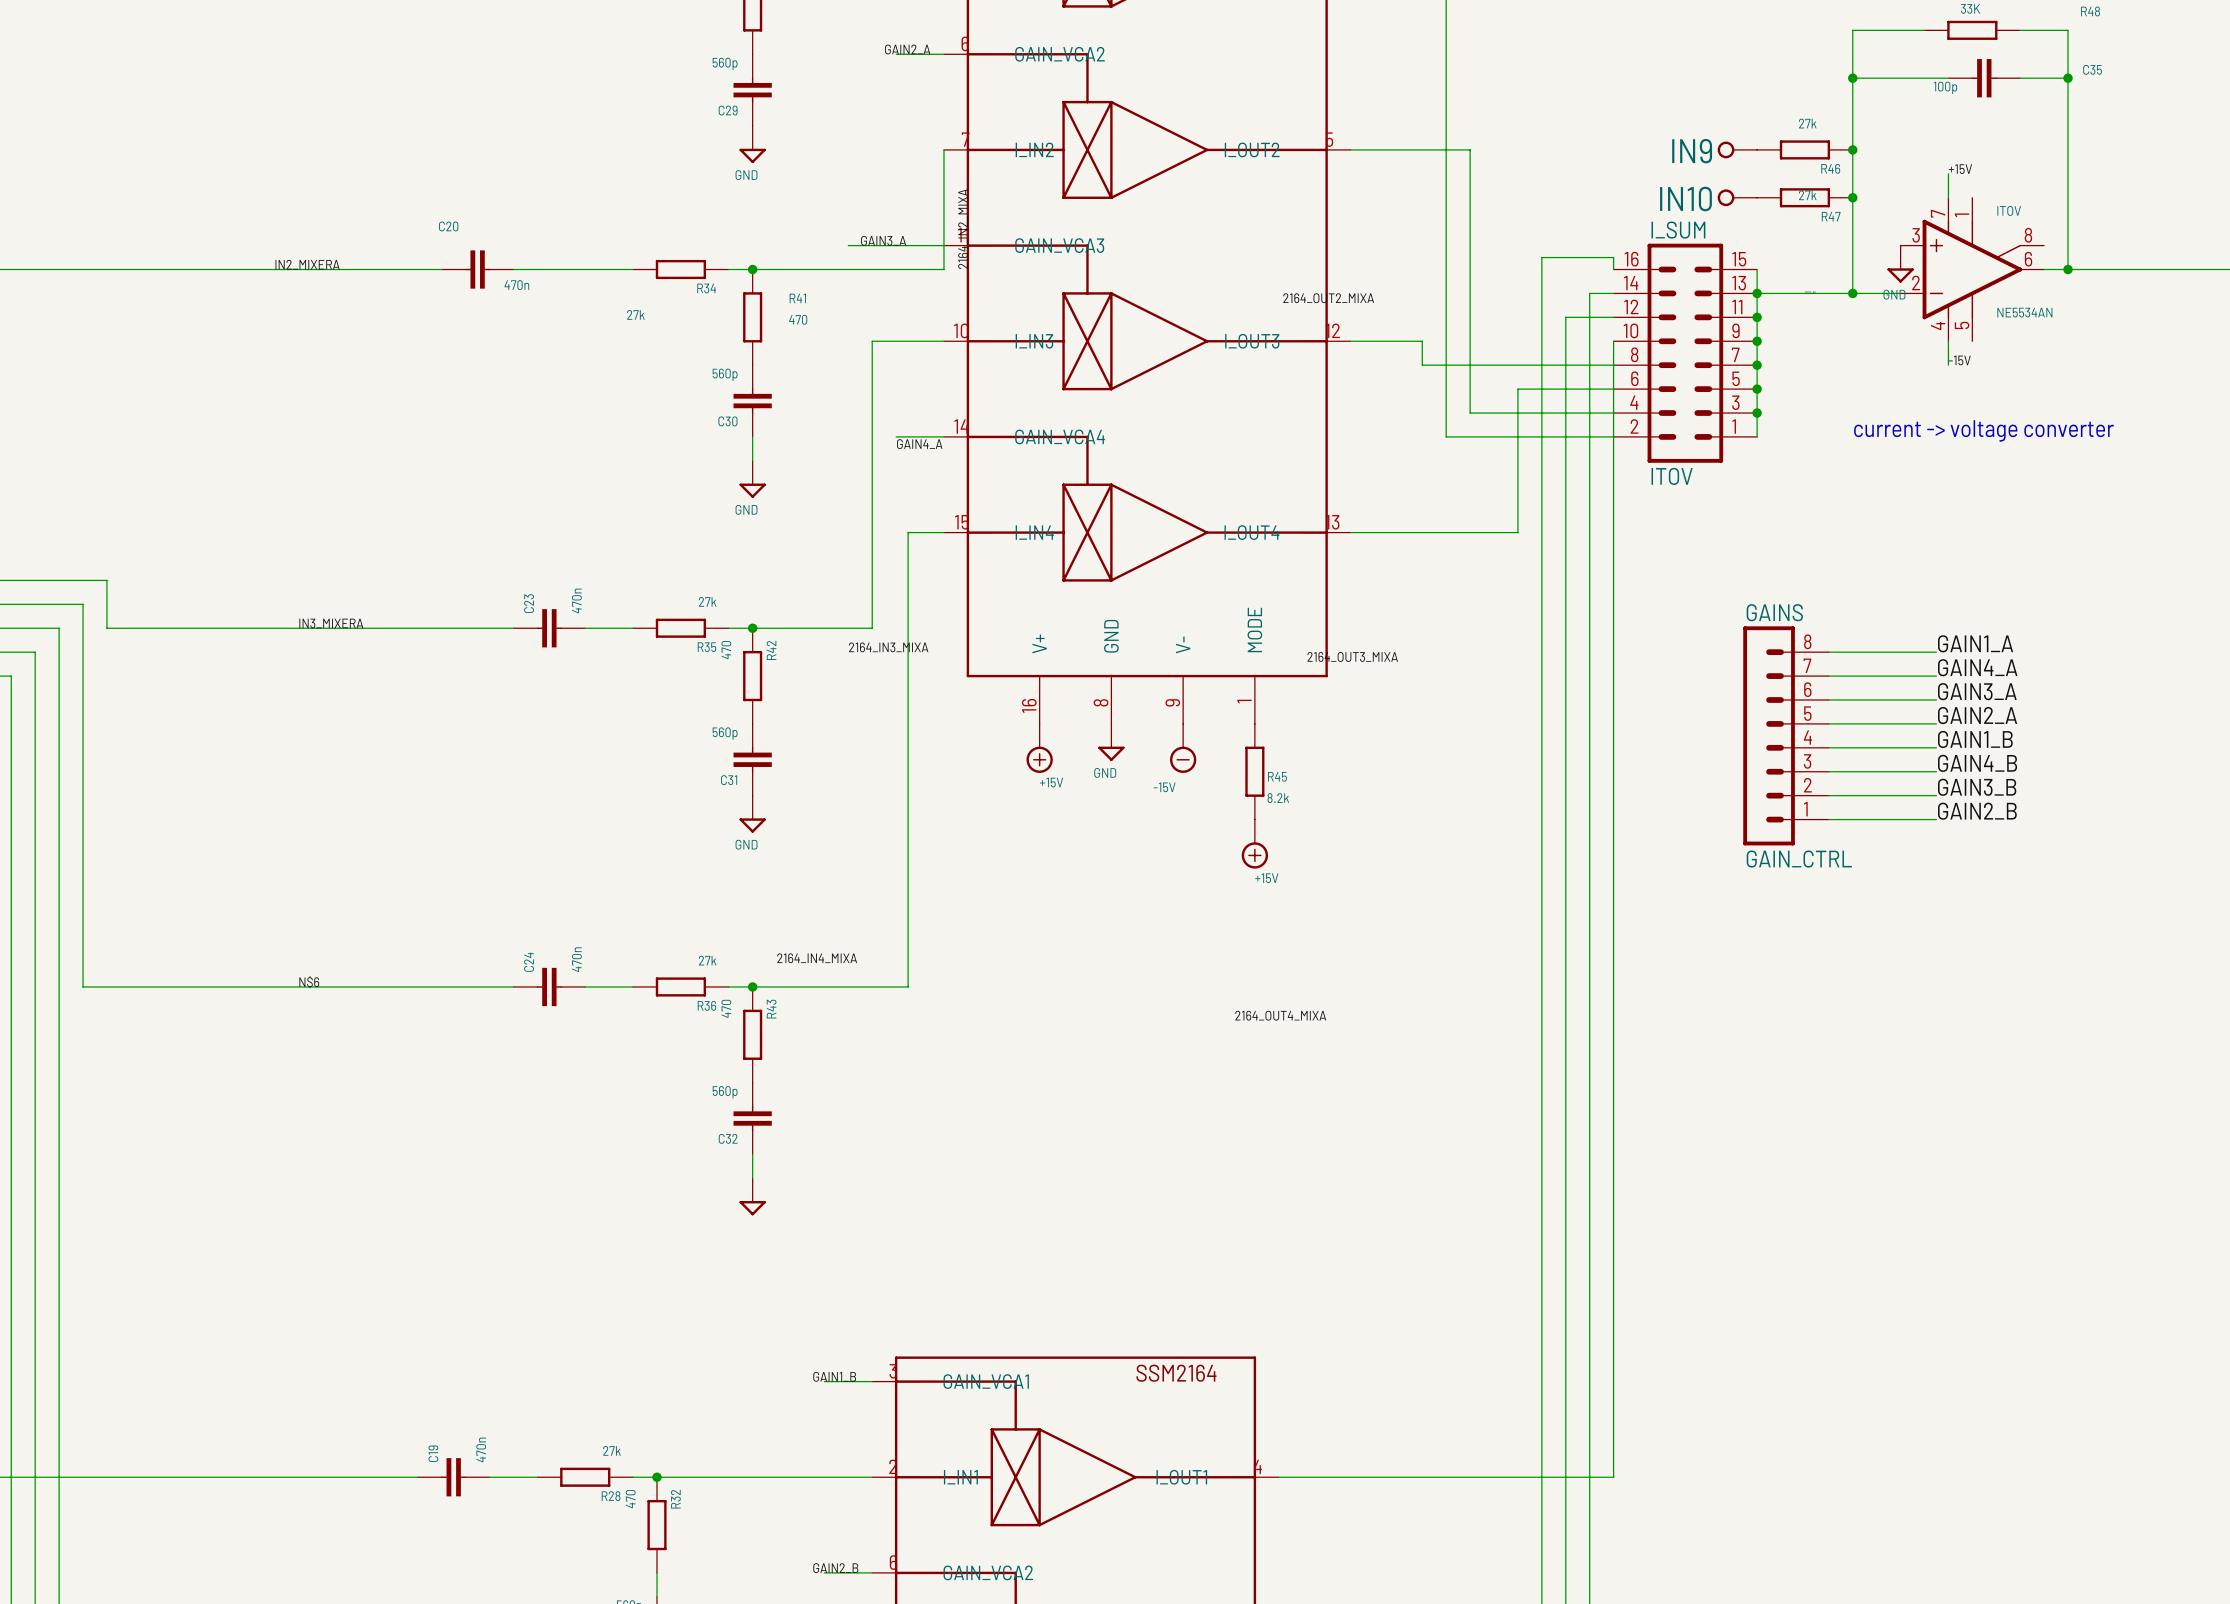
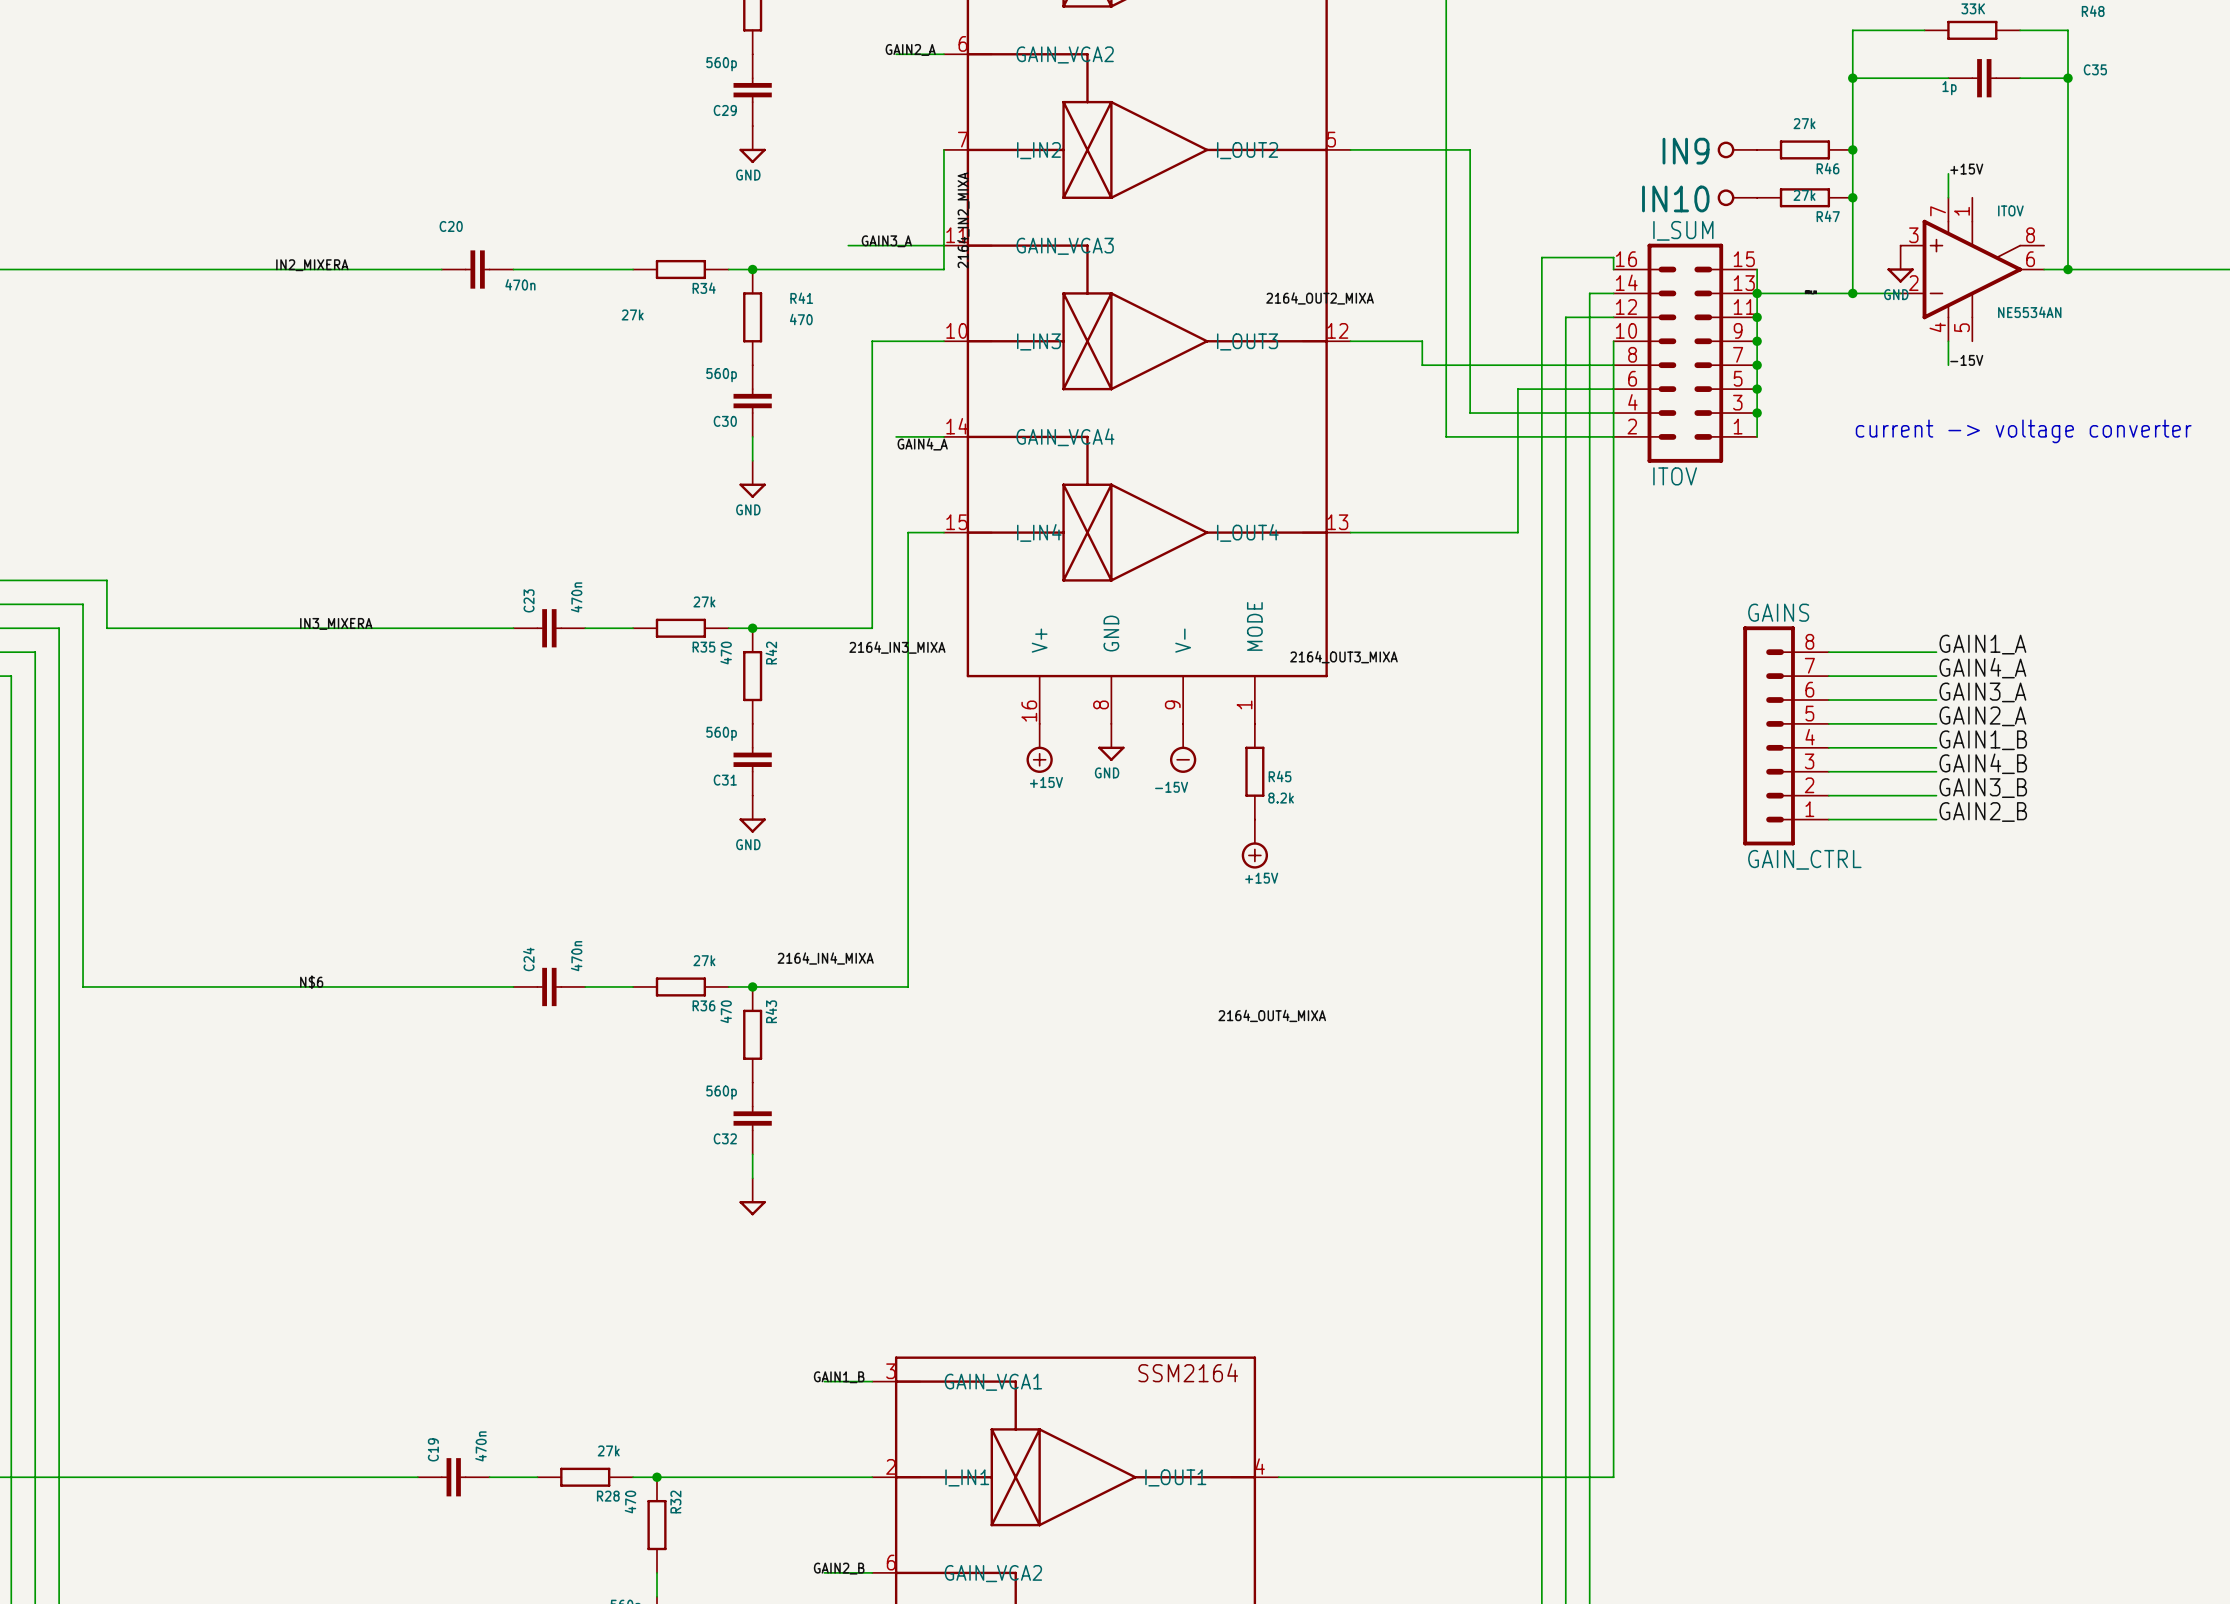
C35 value: 100p (1945, 87) -> 1p (1949, 88)

